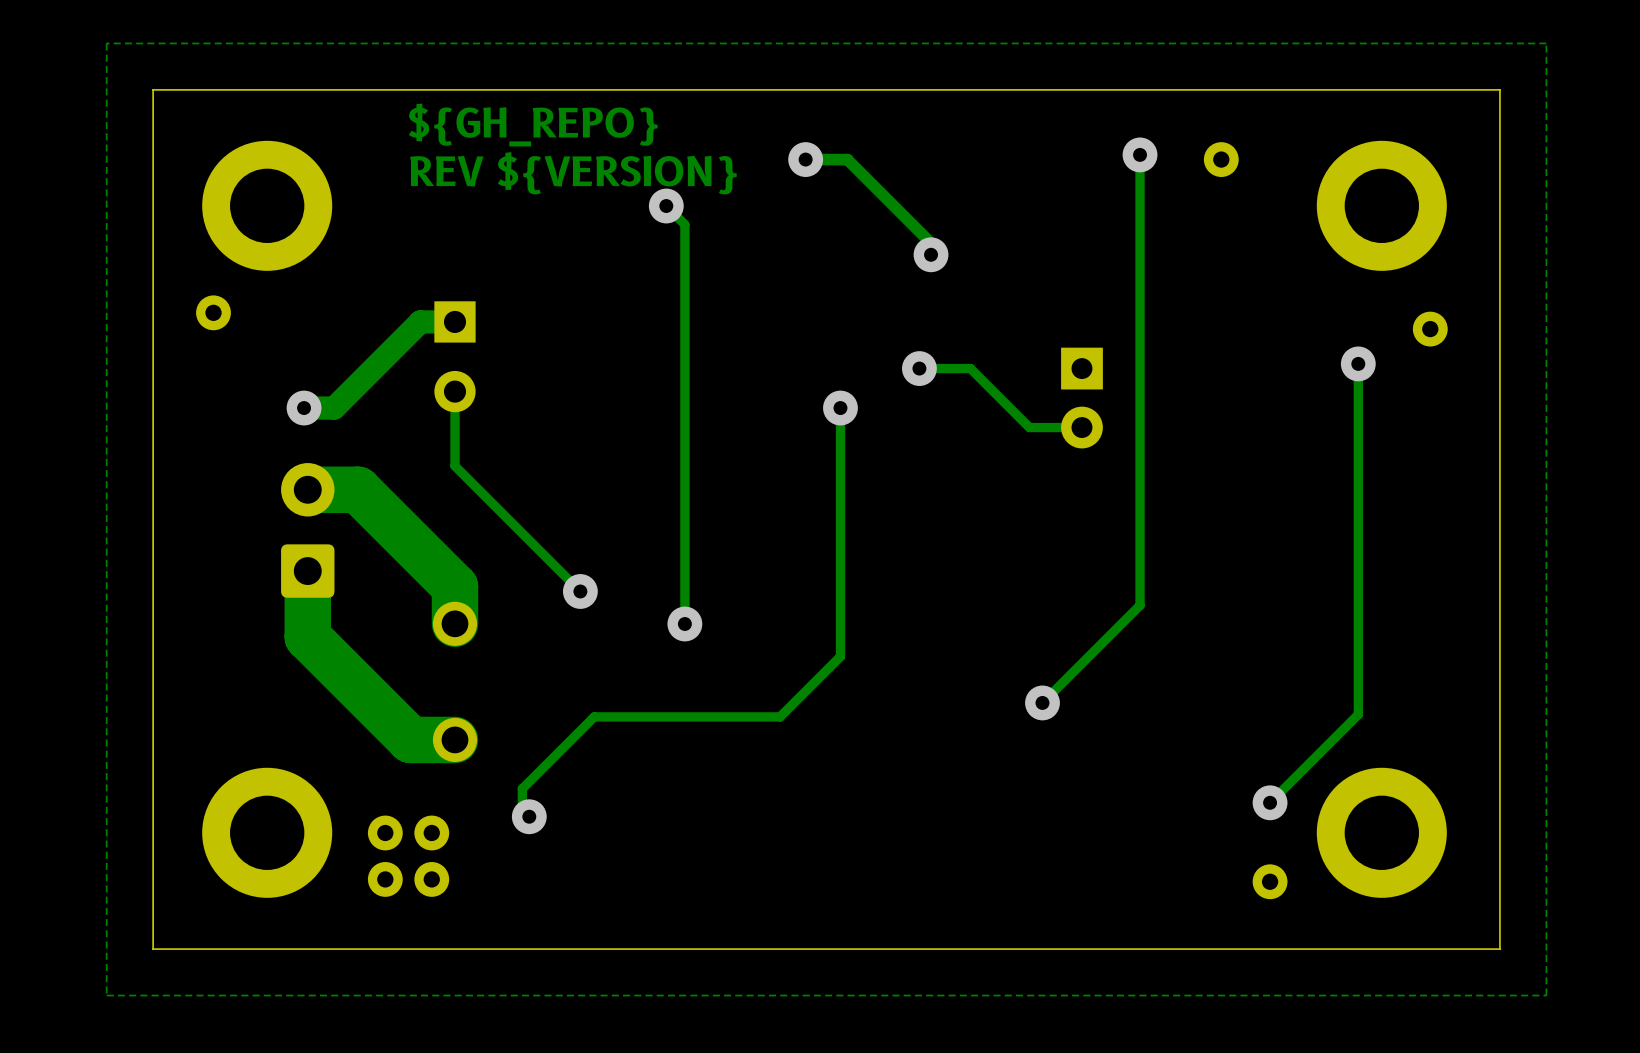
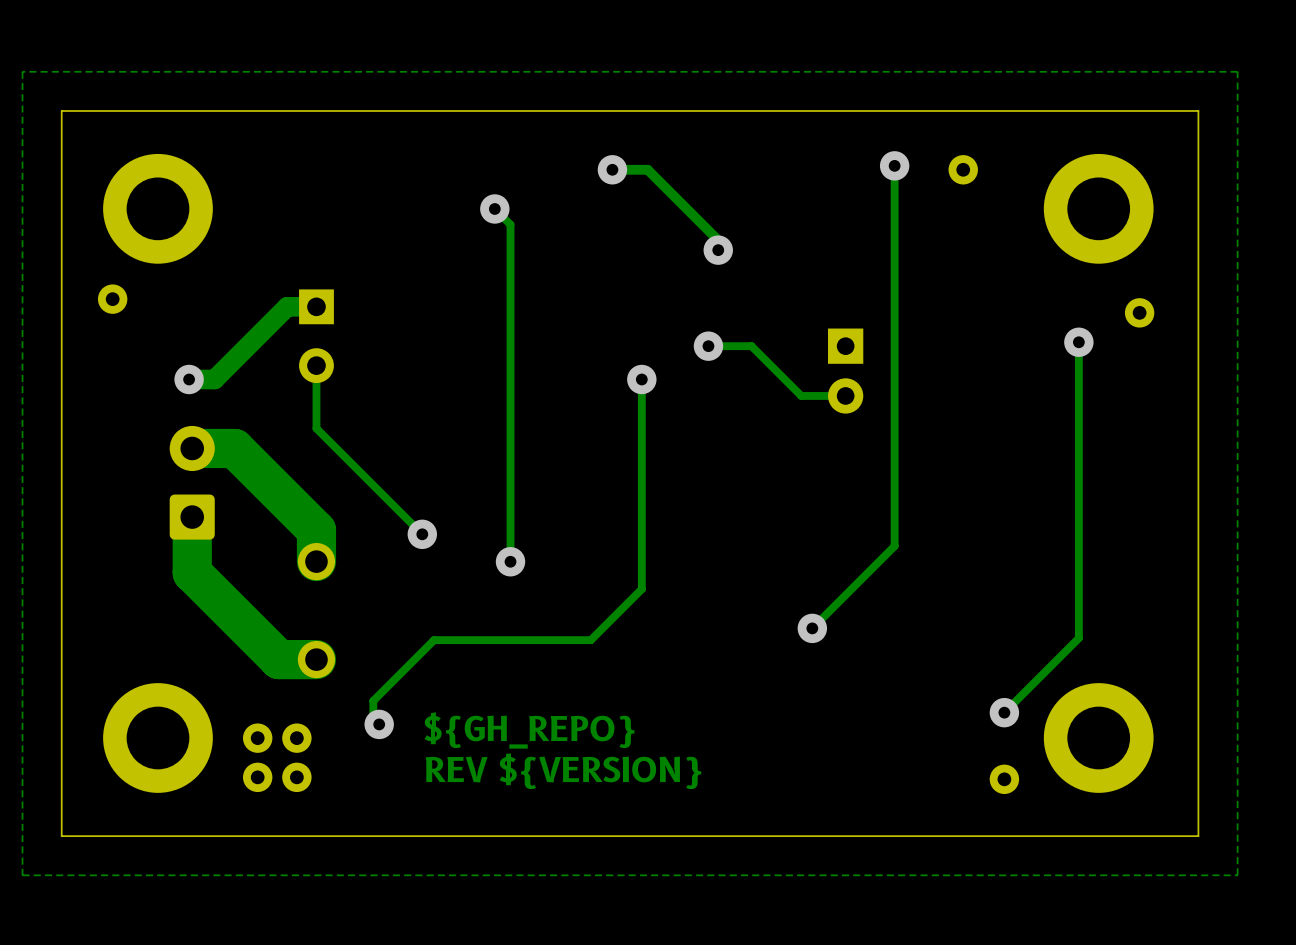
text: ${GH_REPO} (533, 124) -> none
text: REV ${VERSION} (573, 173) -> none
text: none -> ${GH_REPO} (529, 730)
text: none -> REV ${VERSION} (563, 771)

